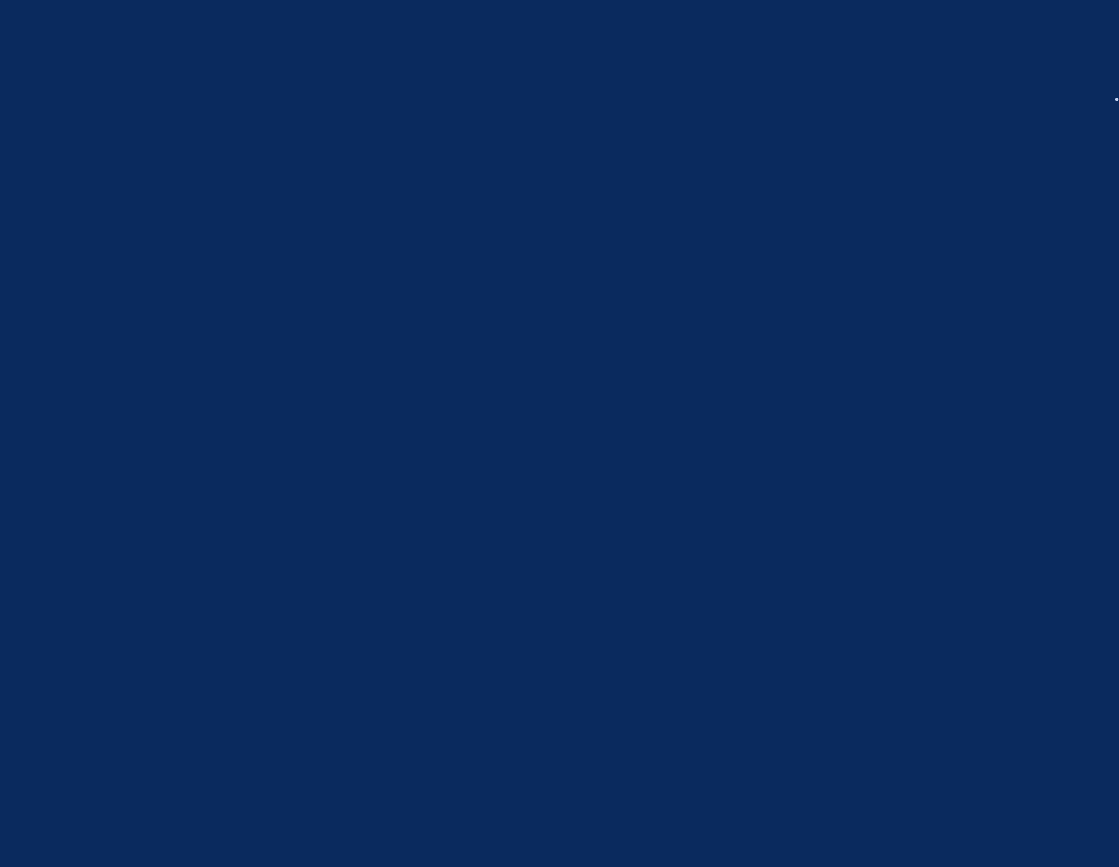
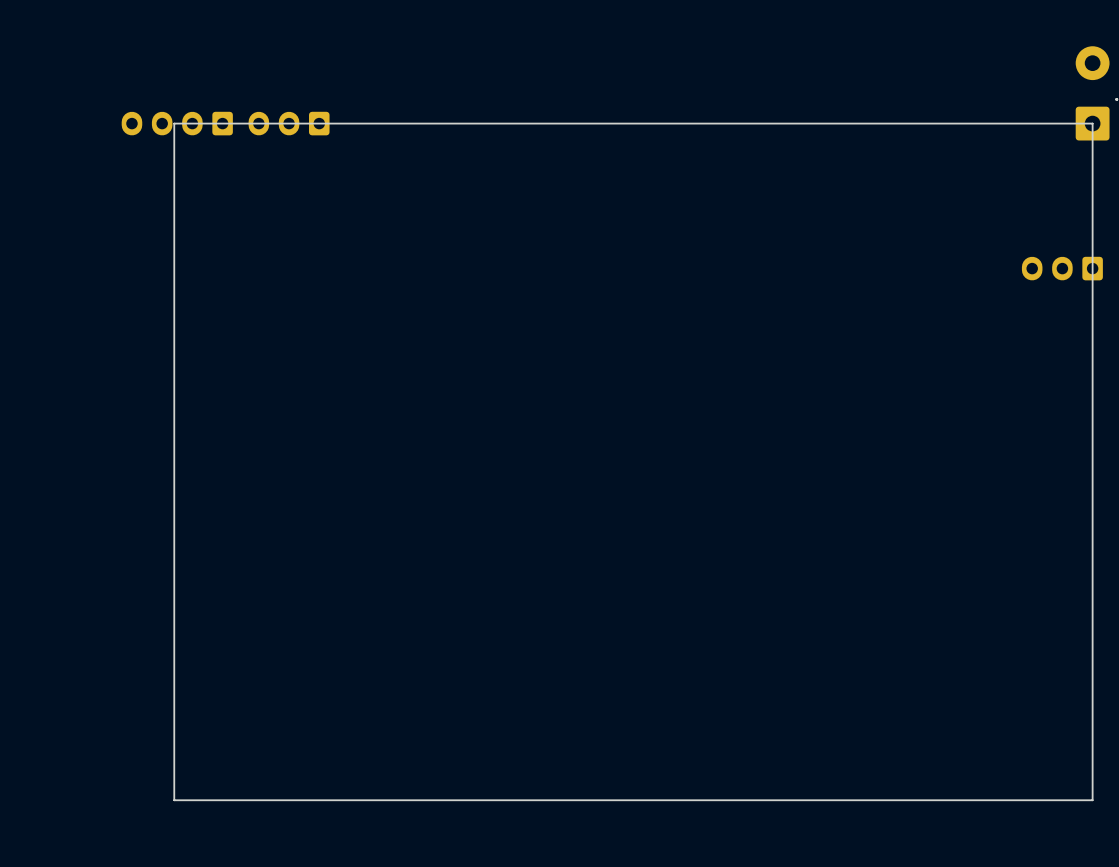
part: none -> (1092, 93)
part: none -> (177, 123)
part: none -> (289, 123)
board edge: none -> (1092, 123) (1092, 800) (174, 800) (174, 123) (1092, 123)
part: none -> (1062, 268)

